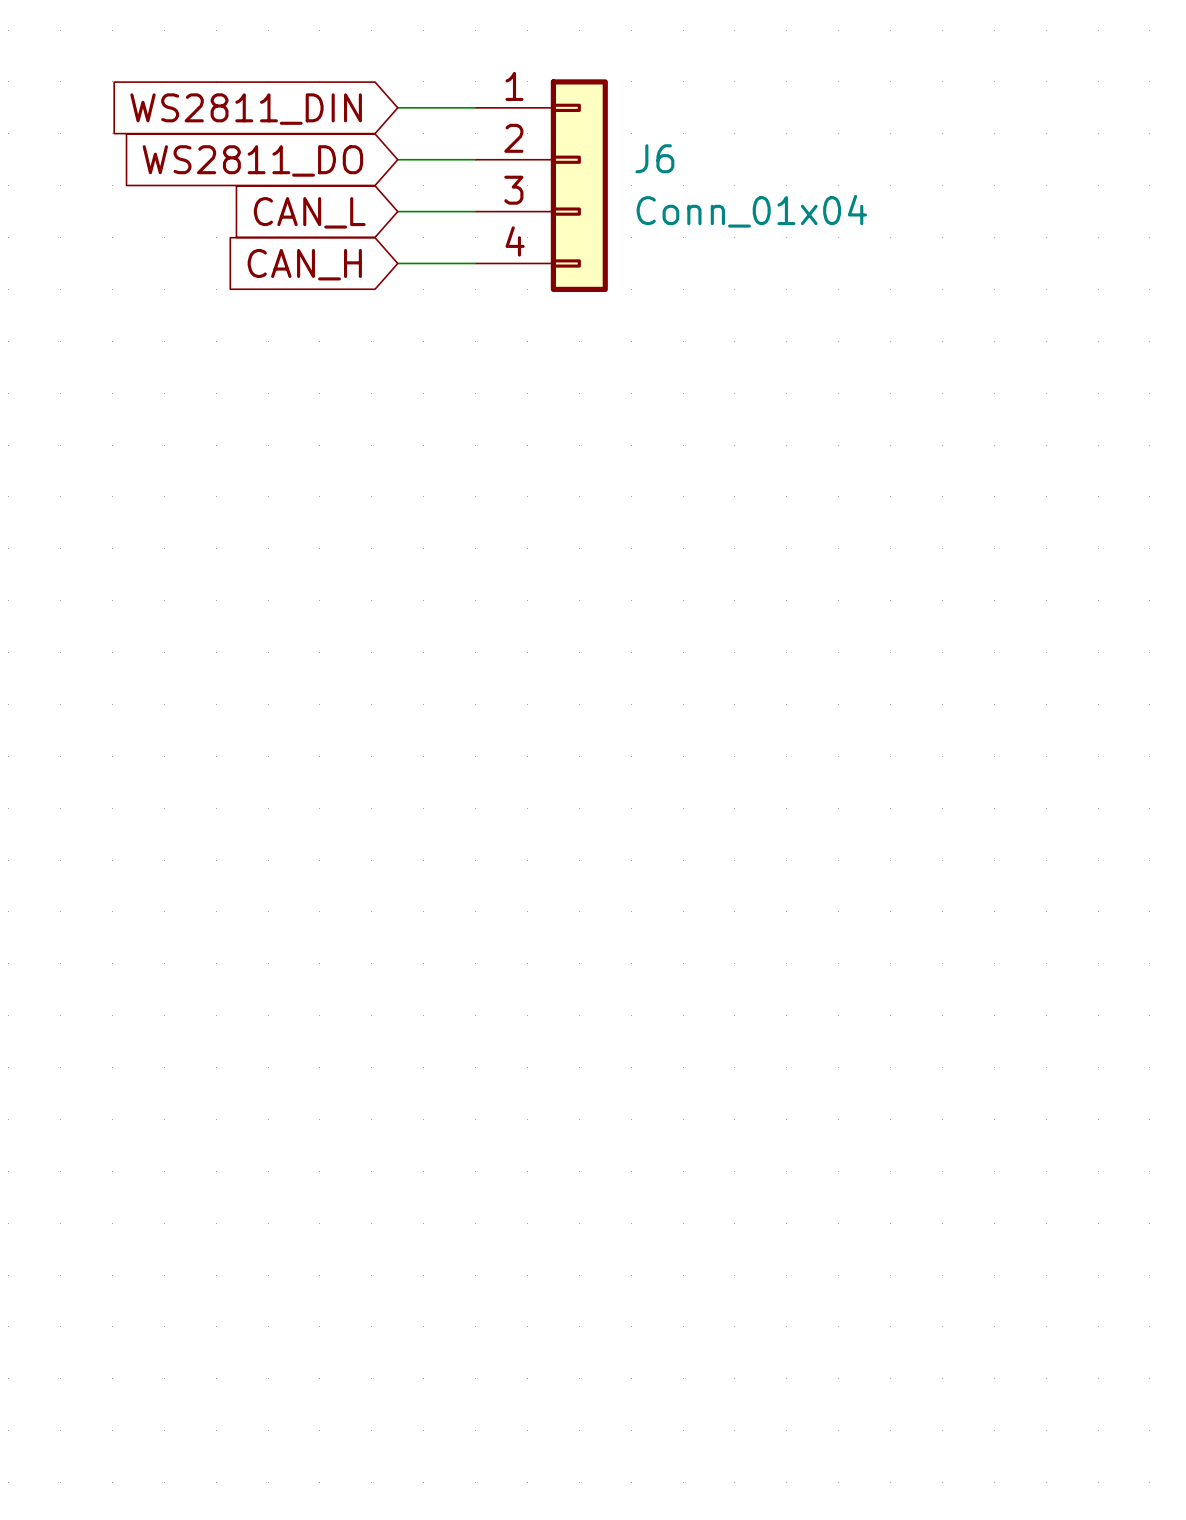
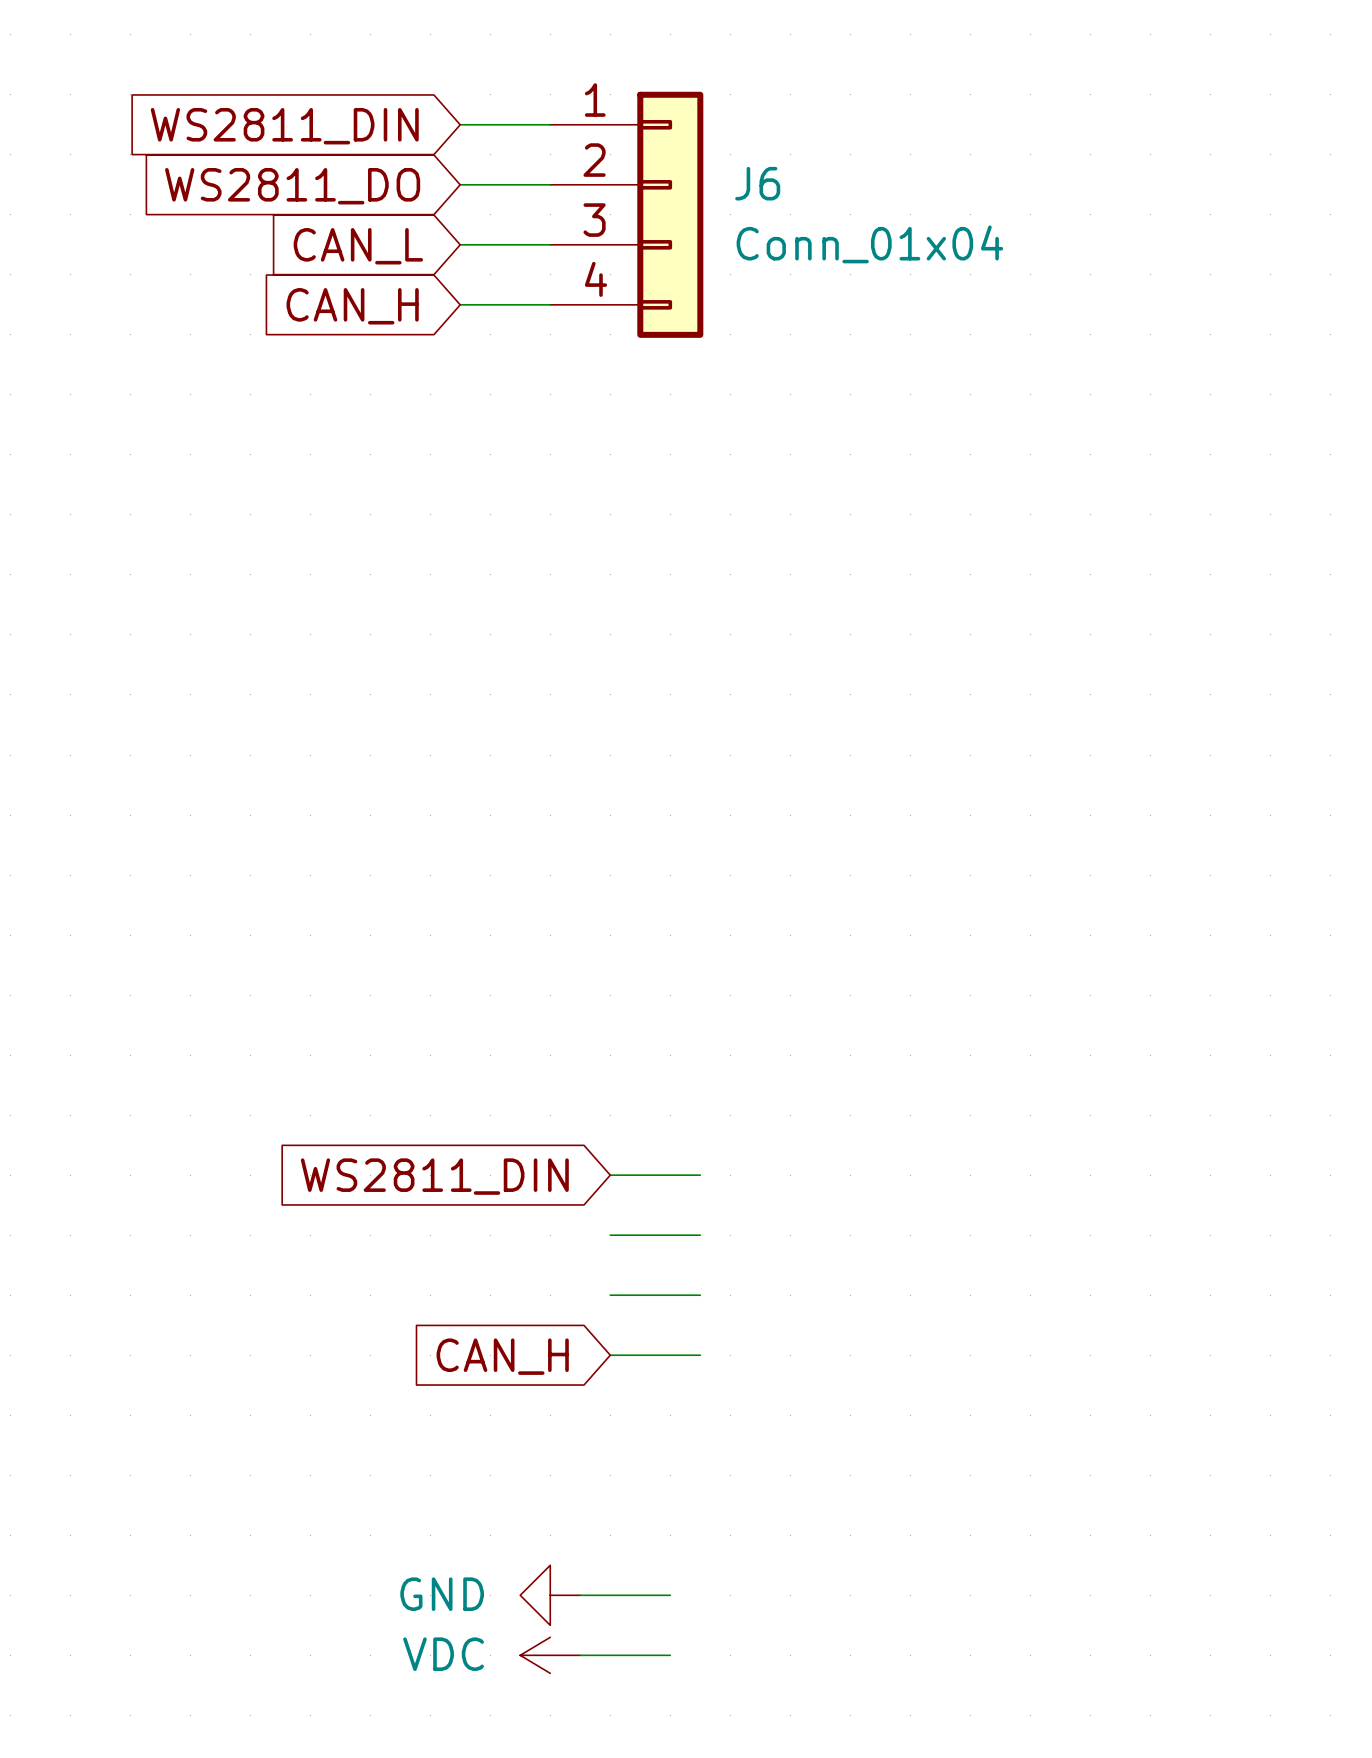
wire: none -> (610, 1175) (700, 1175)
global label: none -> WS2811_DIN (434, 1176)
wire: none -> (610, 1235) (700, 1235)
wire: none -> (610, 1295) (700, 1295)
wire: none -> (610, 1355) (700, 1355)
global label: none -> CAN_H (502, 1356)
power symbol: none -> GND (550, 1595)
wire: none -> (580, 1595) (670, 1595)
power symbol: none -> VDC (550, 1655)
wire: none -> (580, 1655) (670, 1655)

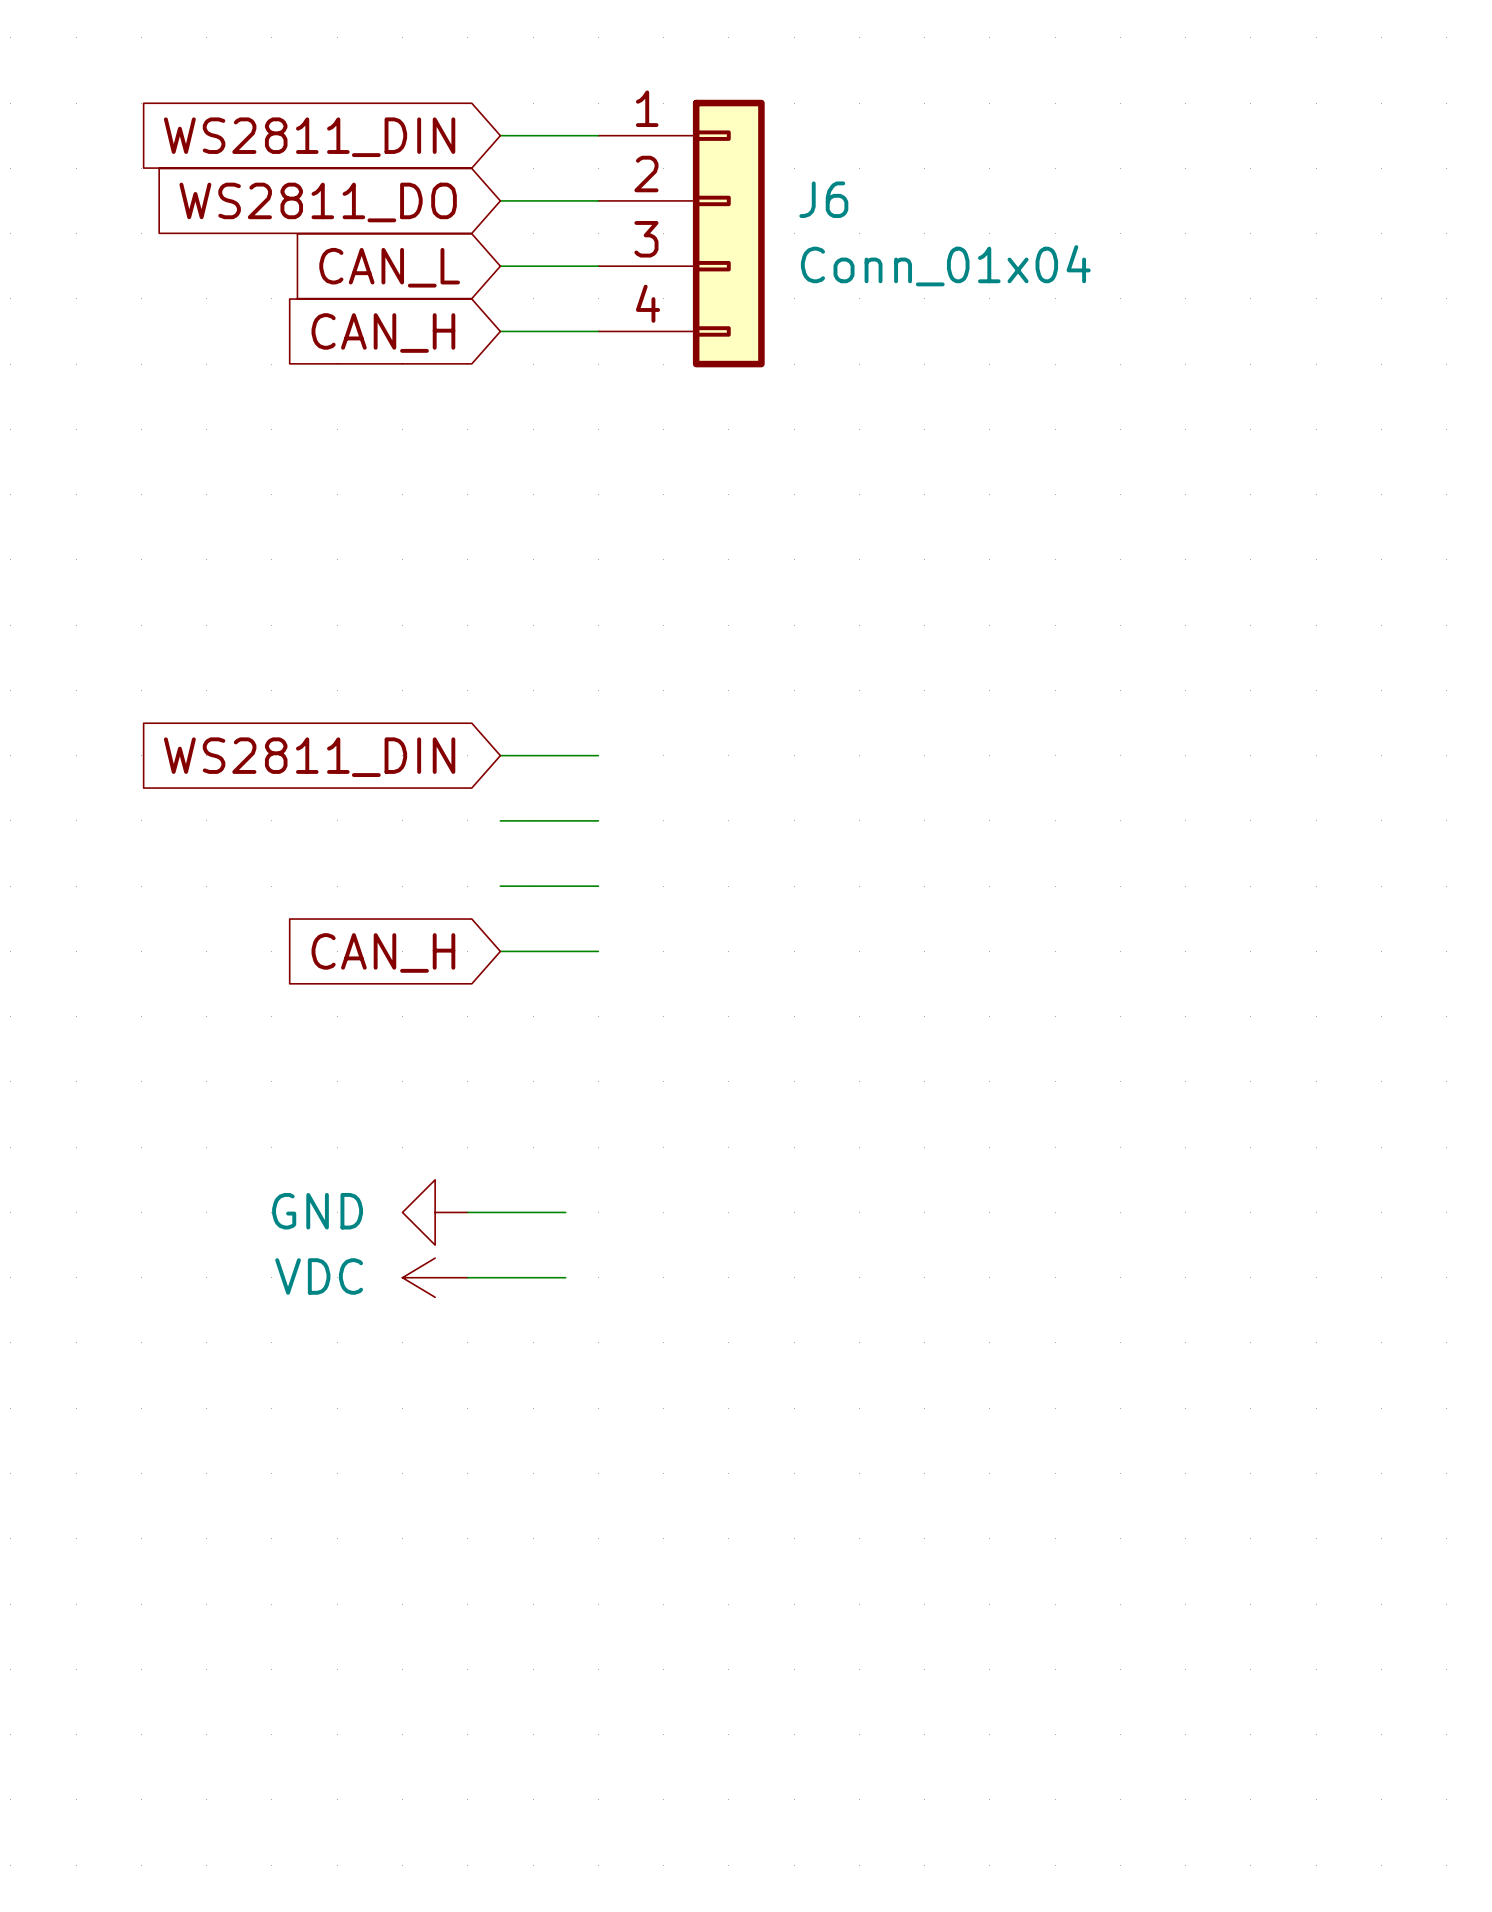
wire: (610, 1175) (700, 1175) -> (500, 755) (598, 755)
global label position: WS2811_DIN (434, 1176) -> WS2811_DIN (309, 757)
wire: (610, 1235) (700, 1235) -> (500, 820) (598, 820)
wire: (610, 1295) (700, 1295) -> (500, 886) (598, 886)
wire: (610, 1355) (700, 1355) -> (500, 951) (598, 951)
global label position: CAN_H (502, 1356) -> CAN_H (383, 952)
power symbol position: GND (550, 1595) -> GND (435, 1212)
wire: (580, 1595) (670, 1595) -> (467, 1212) (565, 1212)
power symbol position: VDC (550, 1655) -> VDC (435, 1277)
wire: (580, 1655) (670, 1655) -> (467, 1277) (565, 1277)

